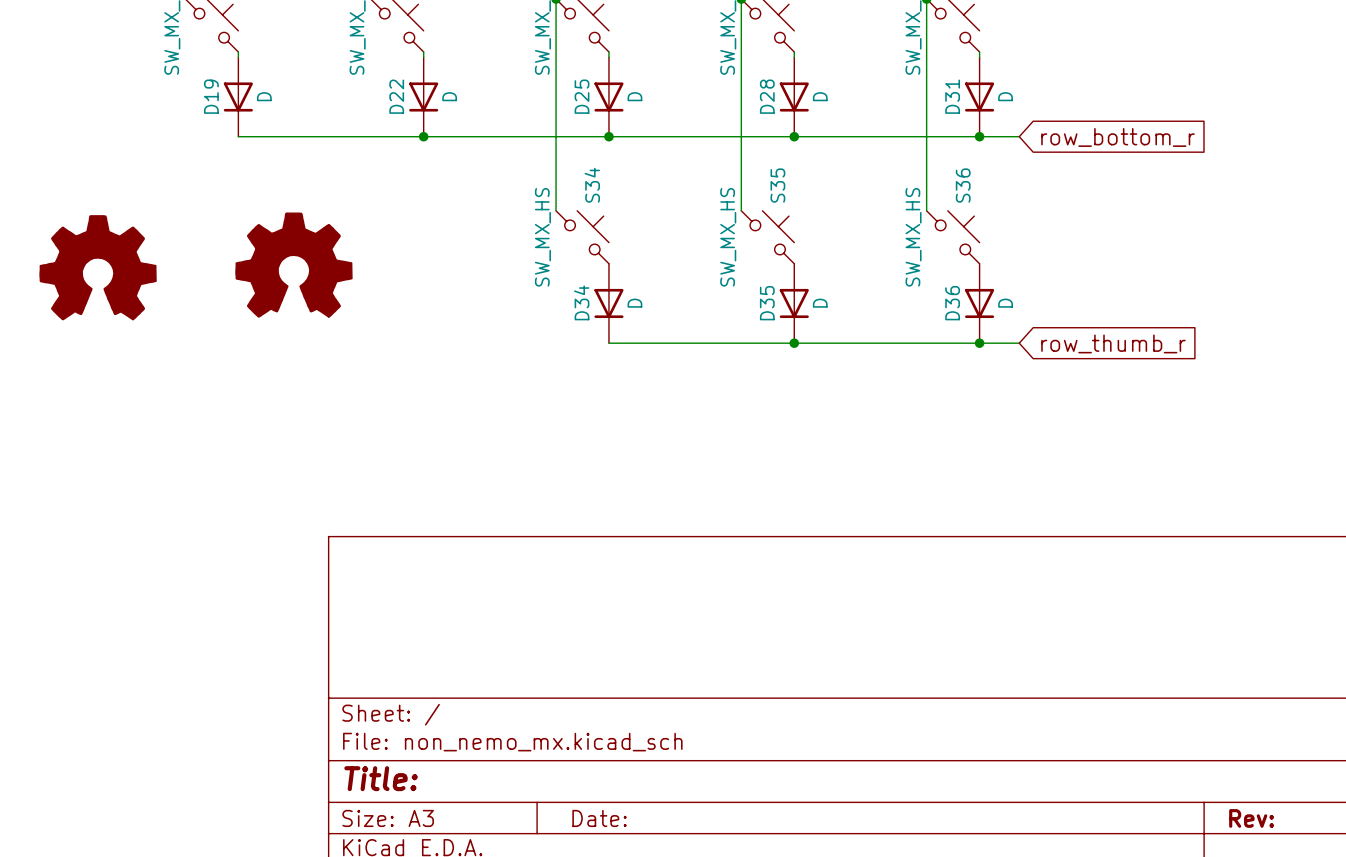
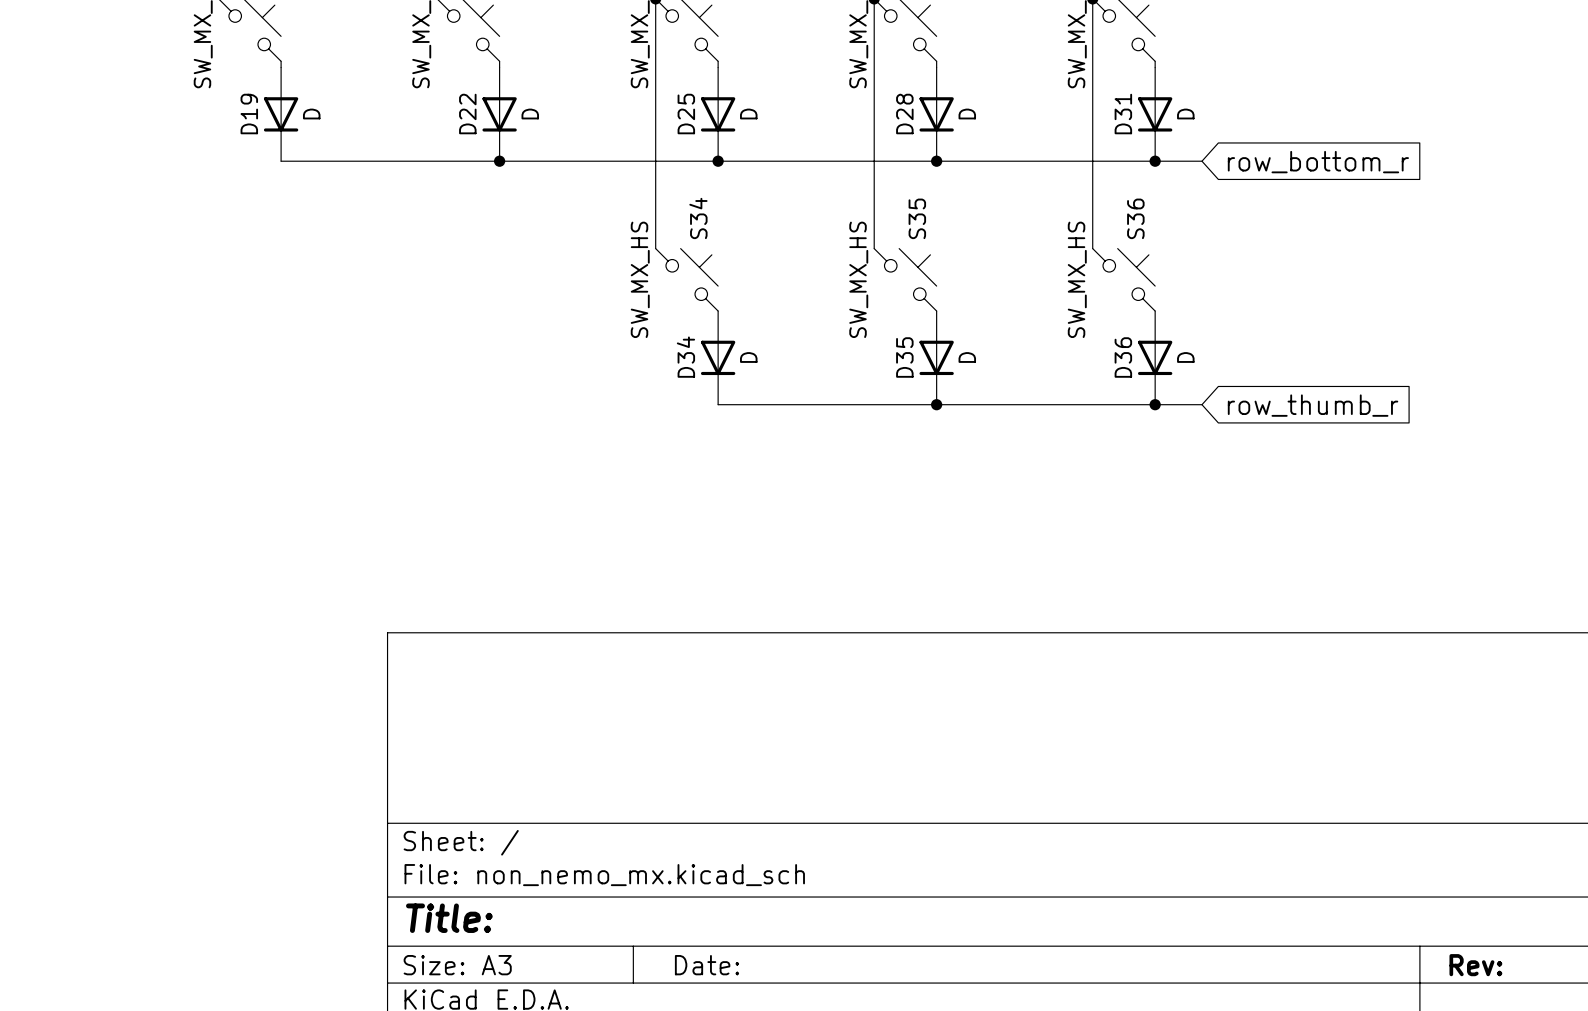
part: (293, 265) -> none
part: (98, 267) -> none

